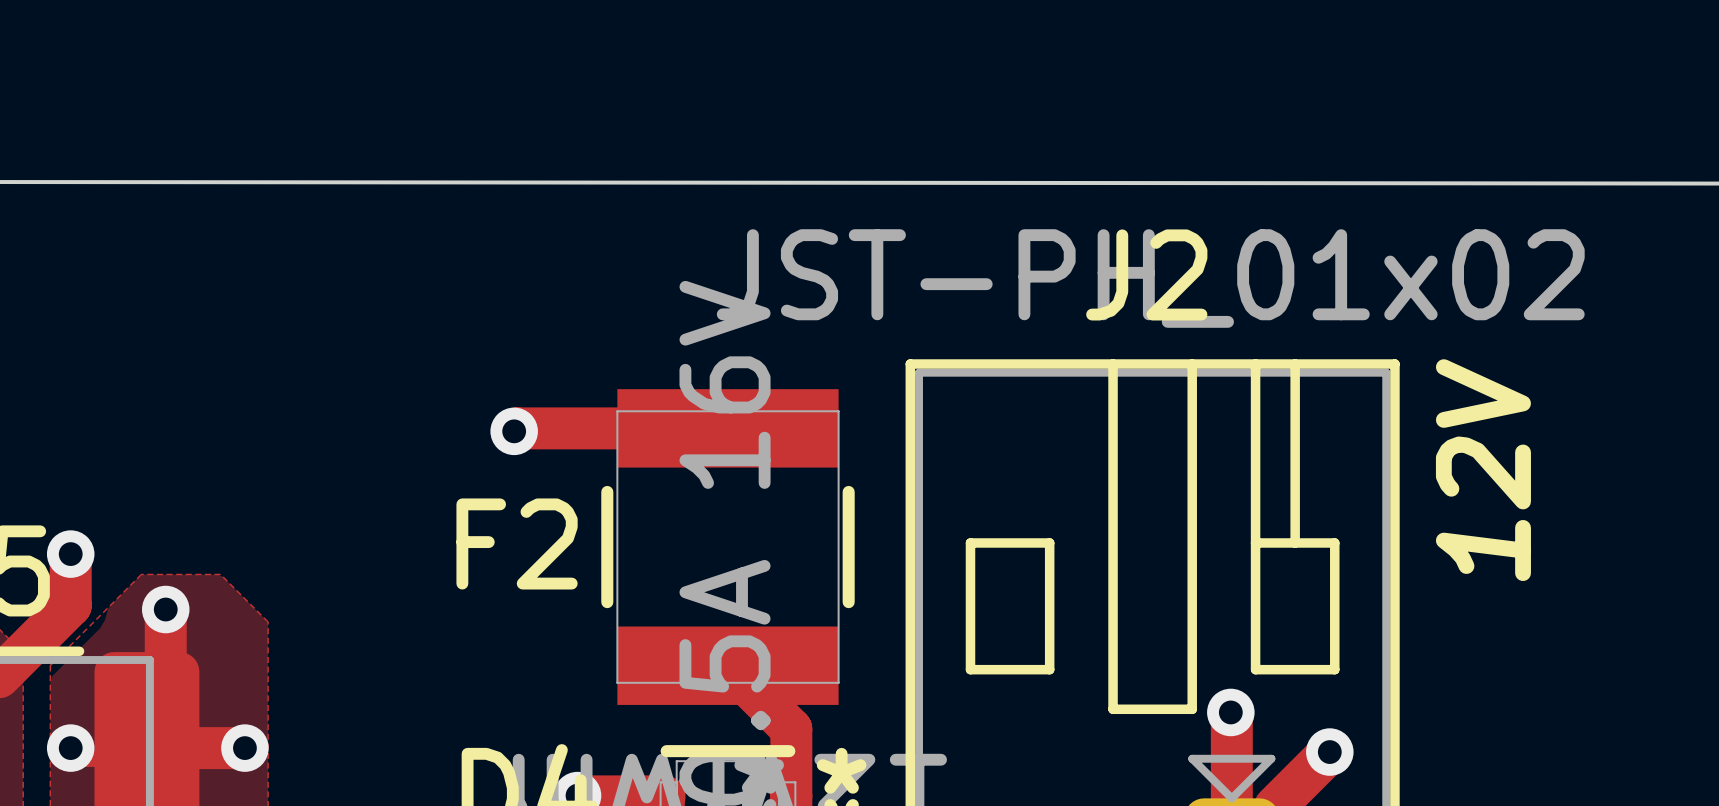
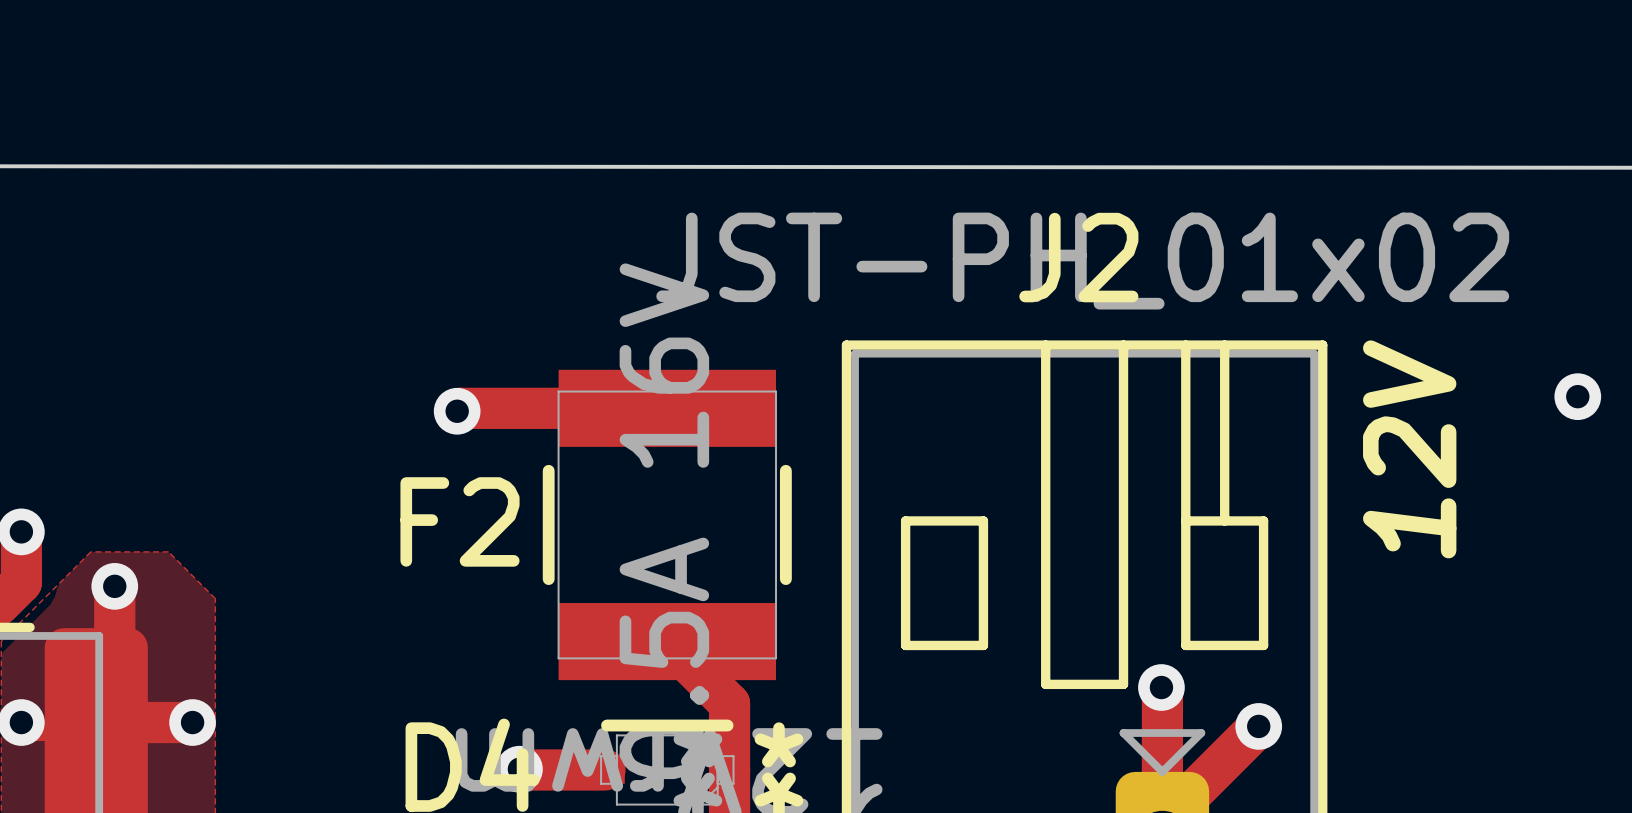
via: none -> (1577, 396)

